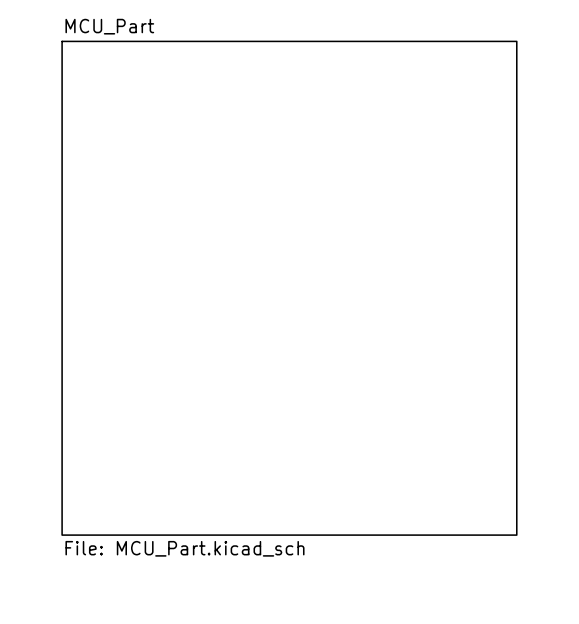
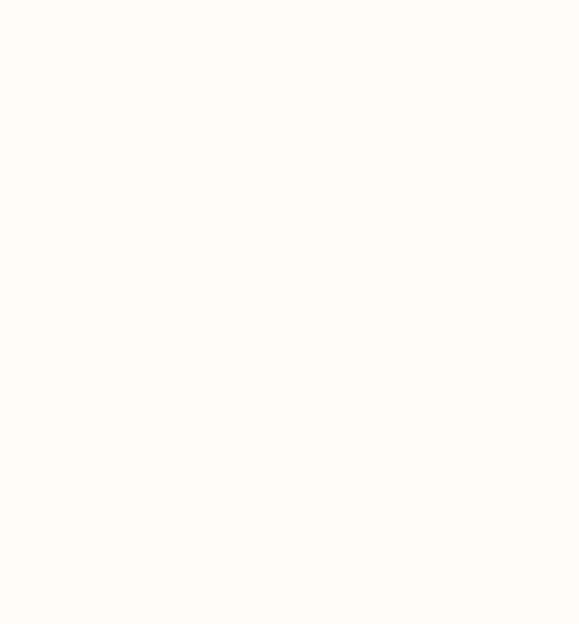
sheet MCU_Part: File: MCU_Part.kicad_sch (289, 288) -> none

